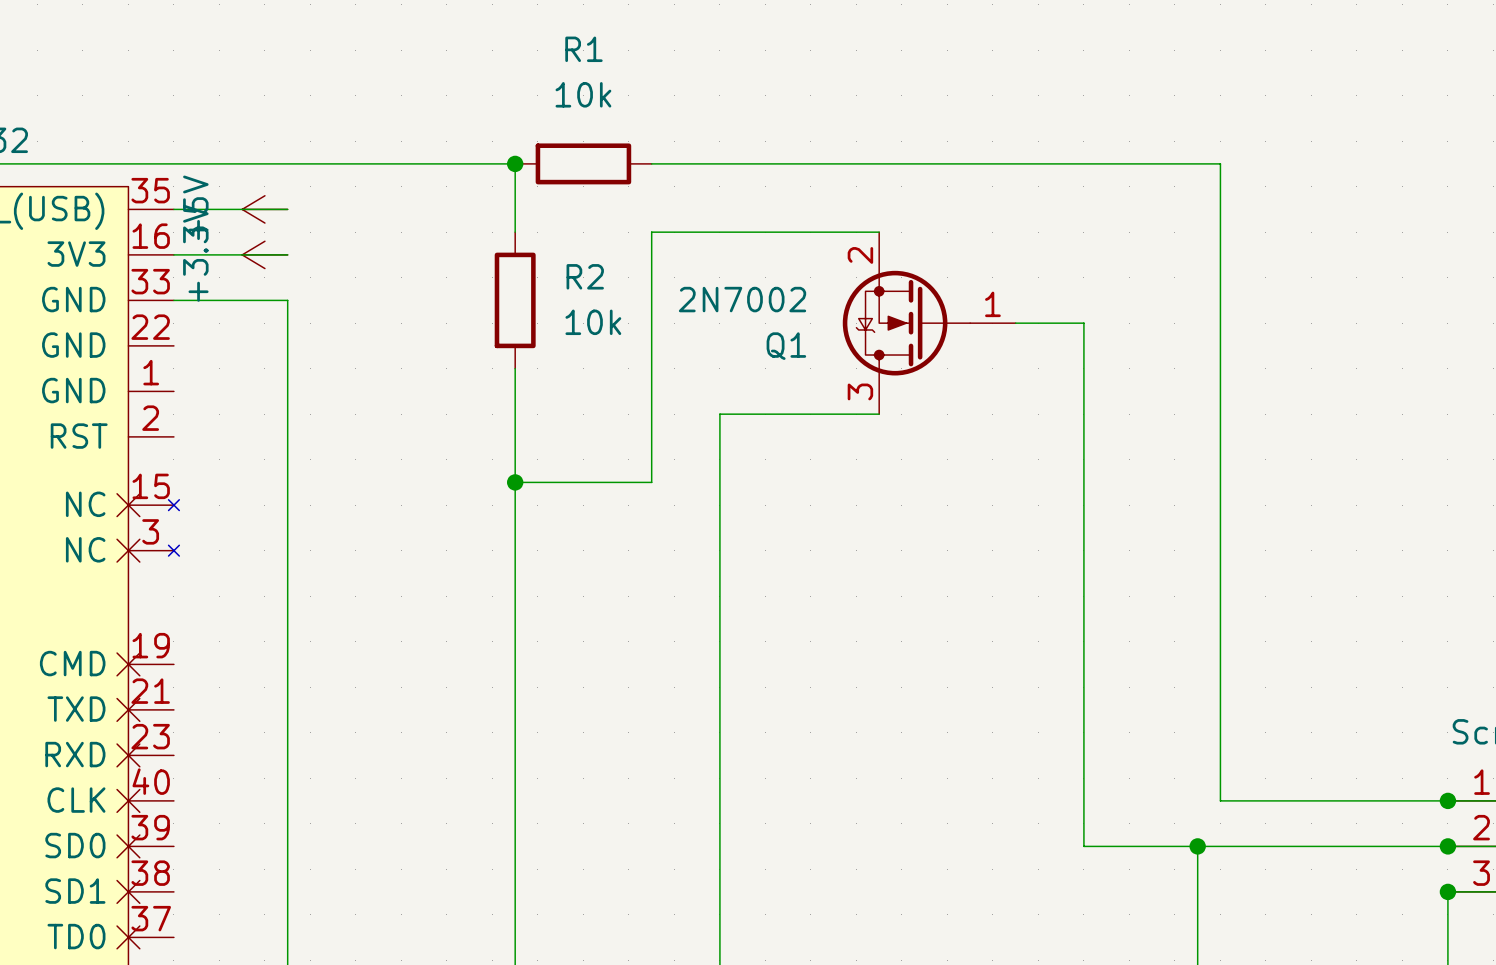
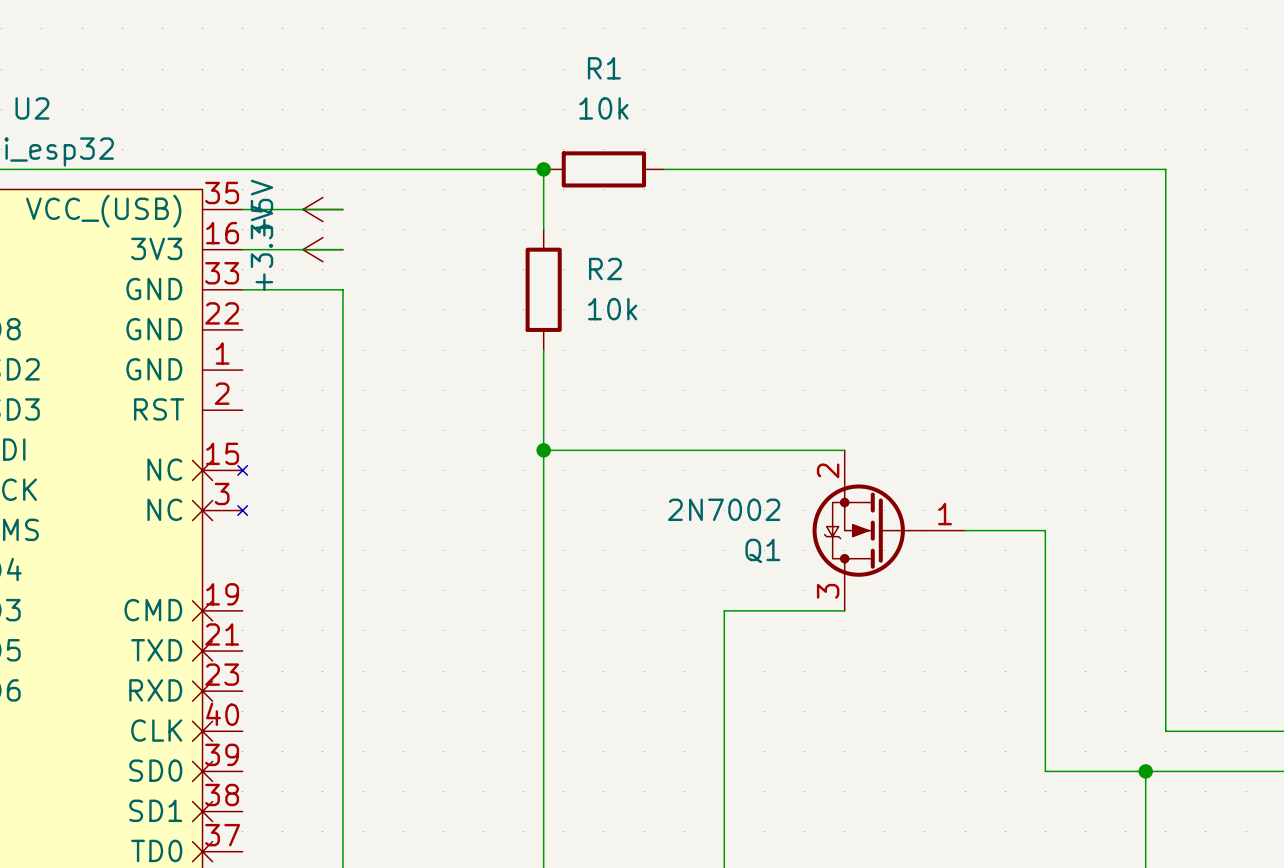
wire: (879, 232) (651, 232) (651, 482) -> (844, 450) (664, 450)
Q1 position: (929, 323) -> (888, 530)
wire: (1015, 323) (1083, 323) (1083, 573) -> (965, 530) (1045, 530)
wire: (879, 414) (719, 414) (719, 664) -> (844, 610) (724, 610)

